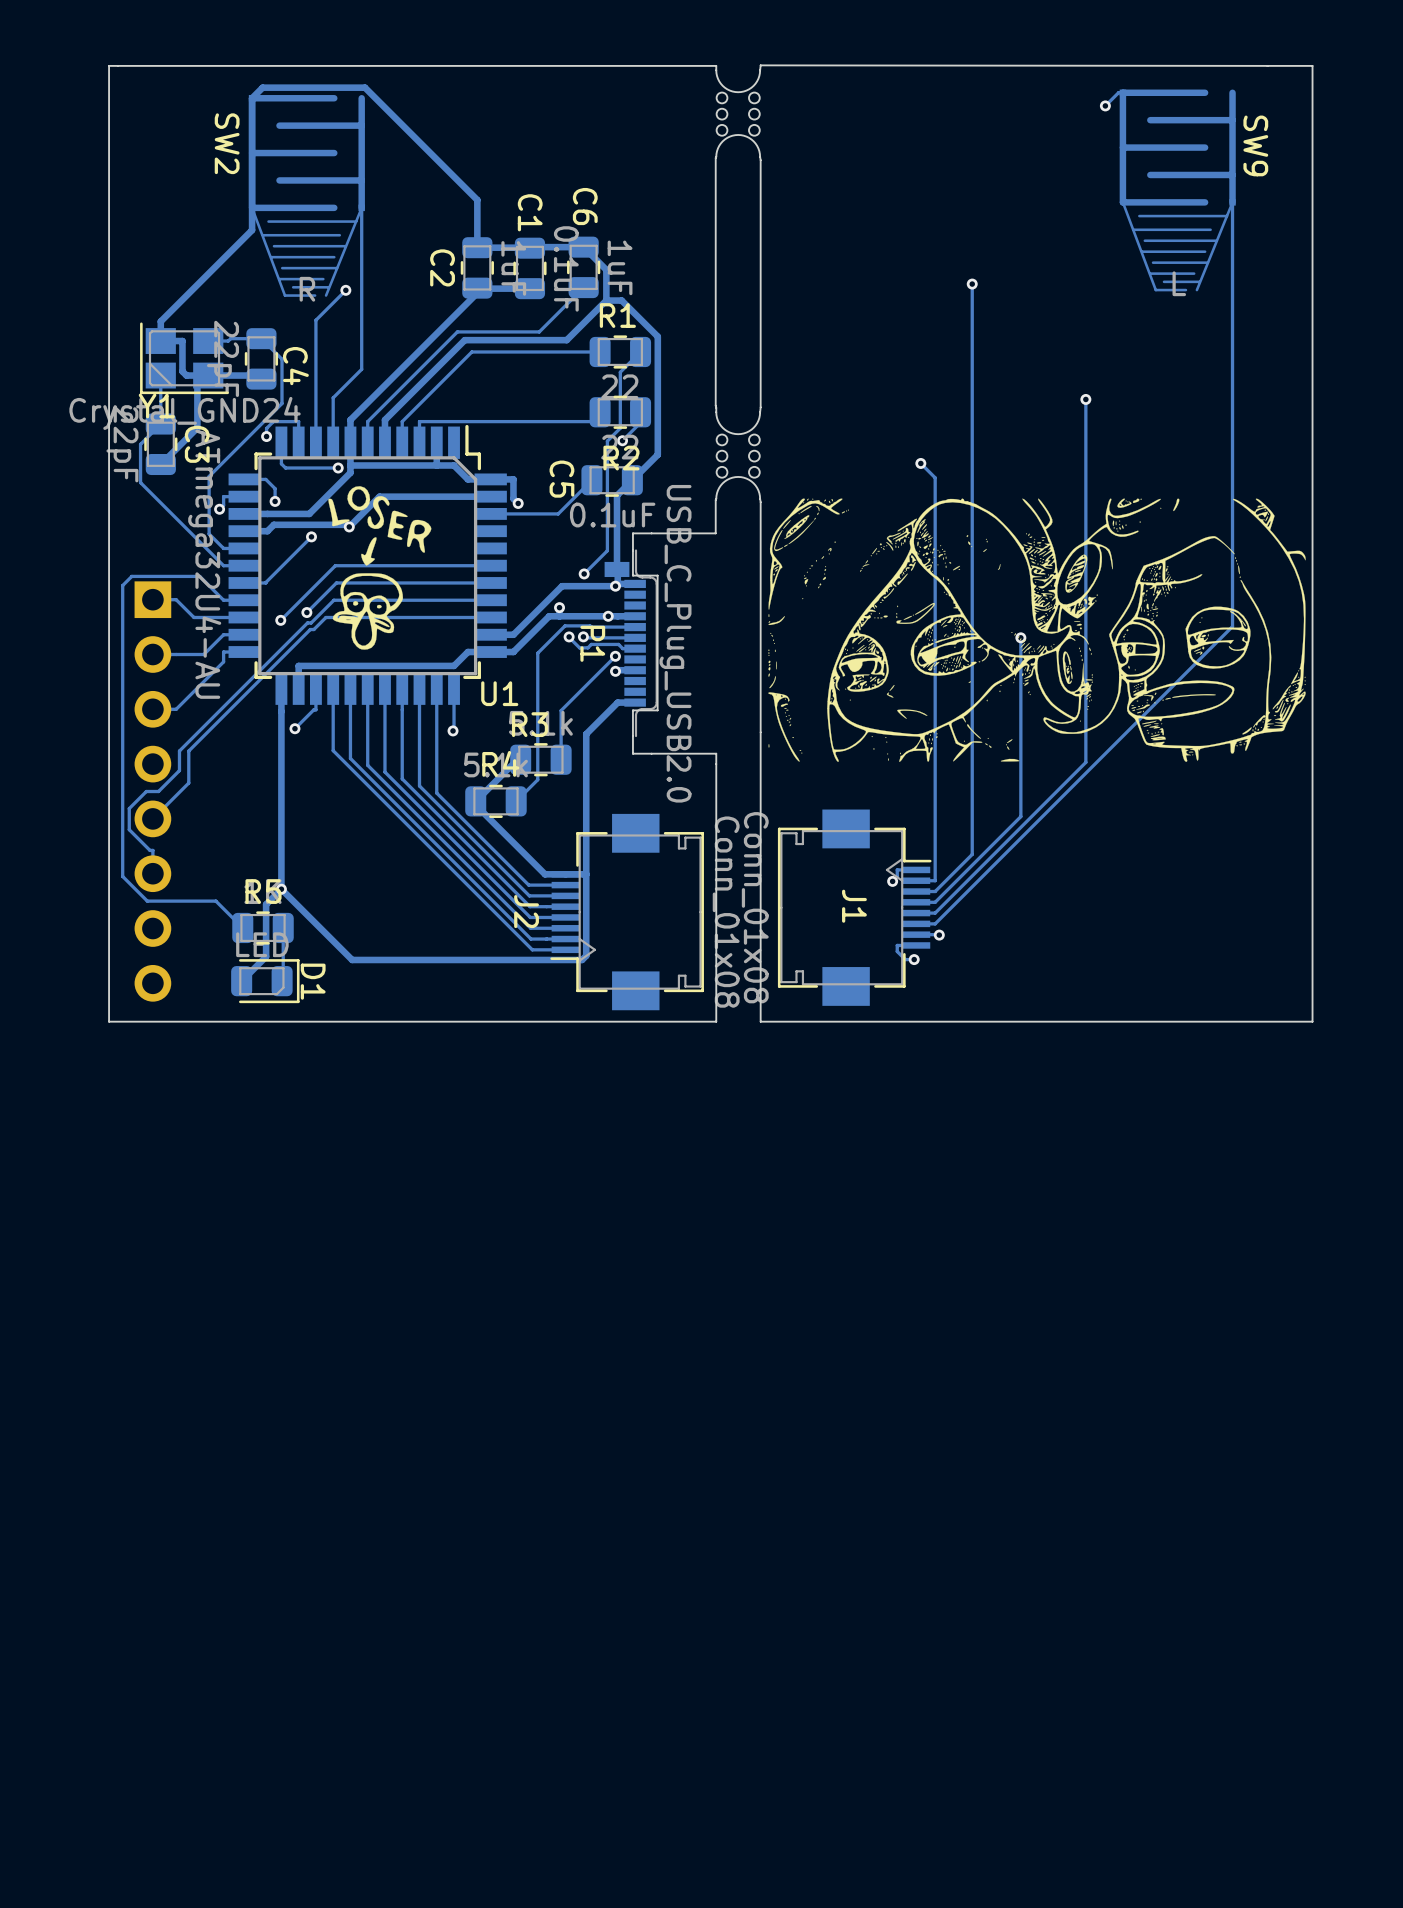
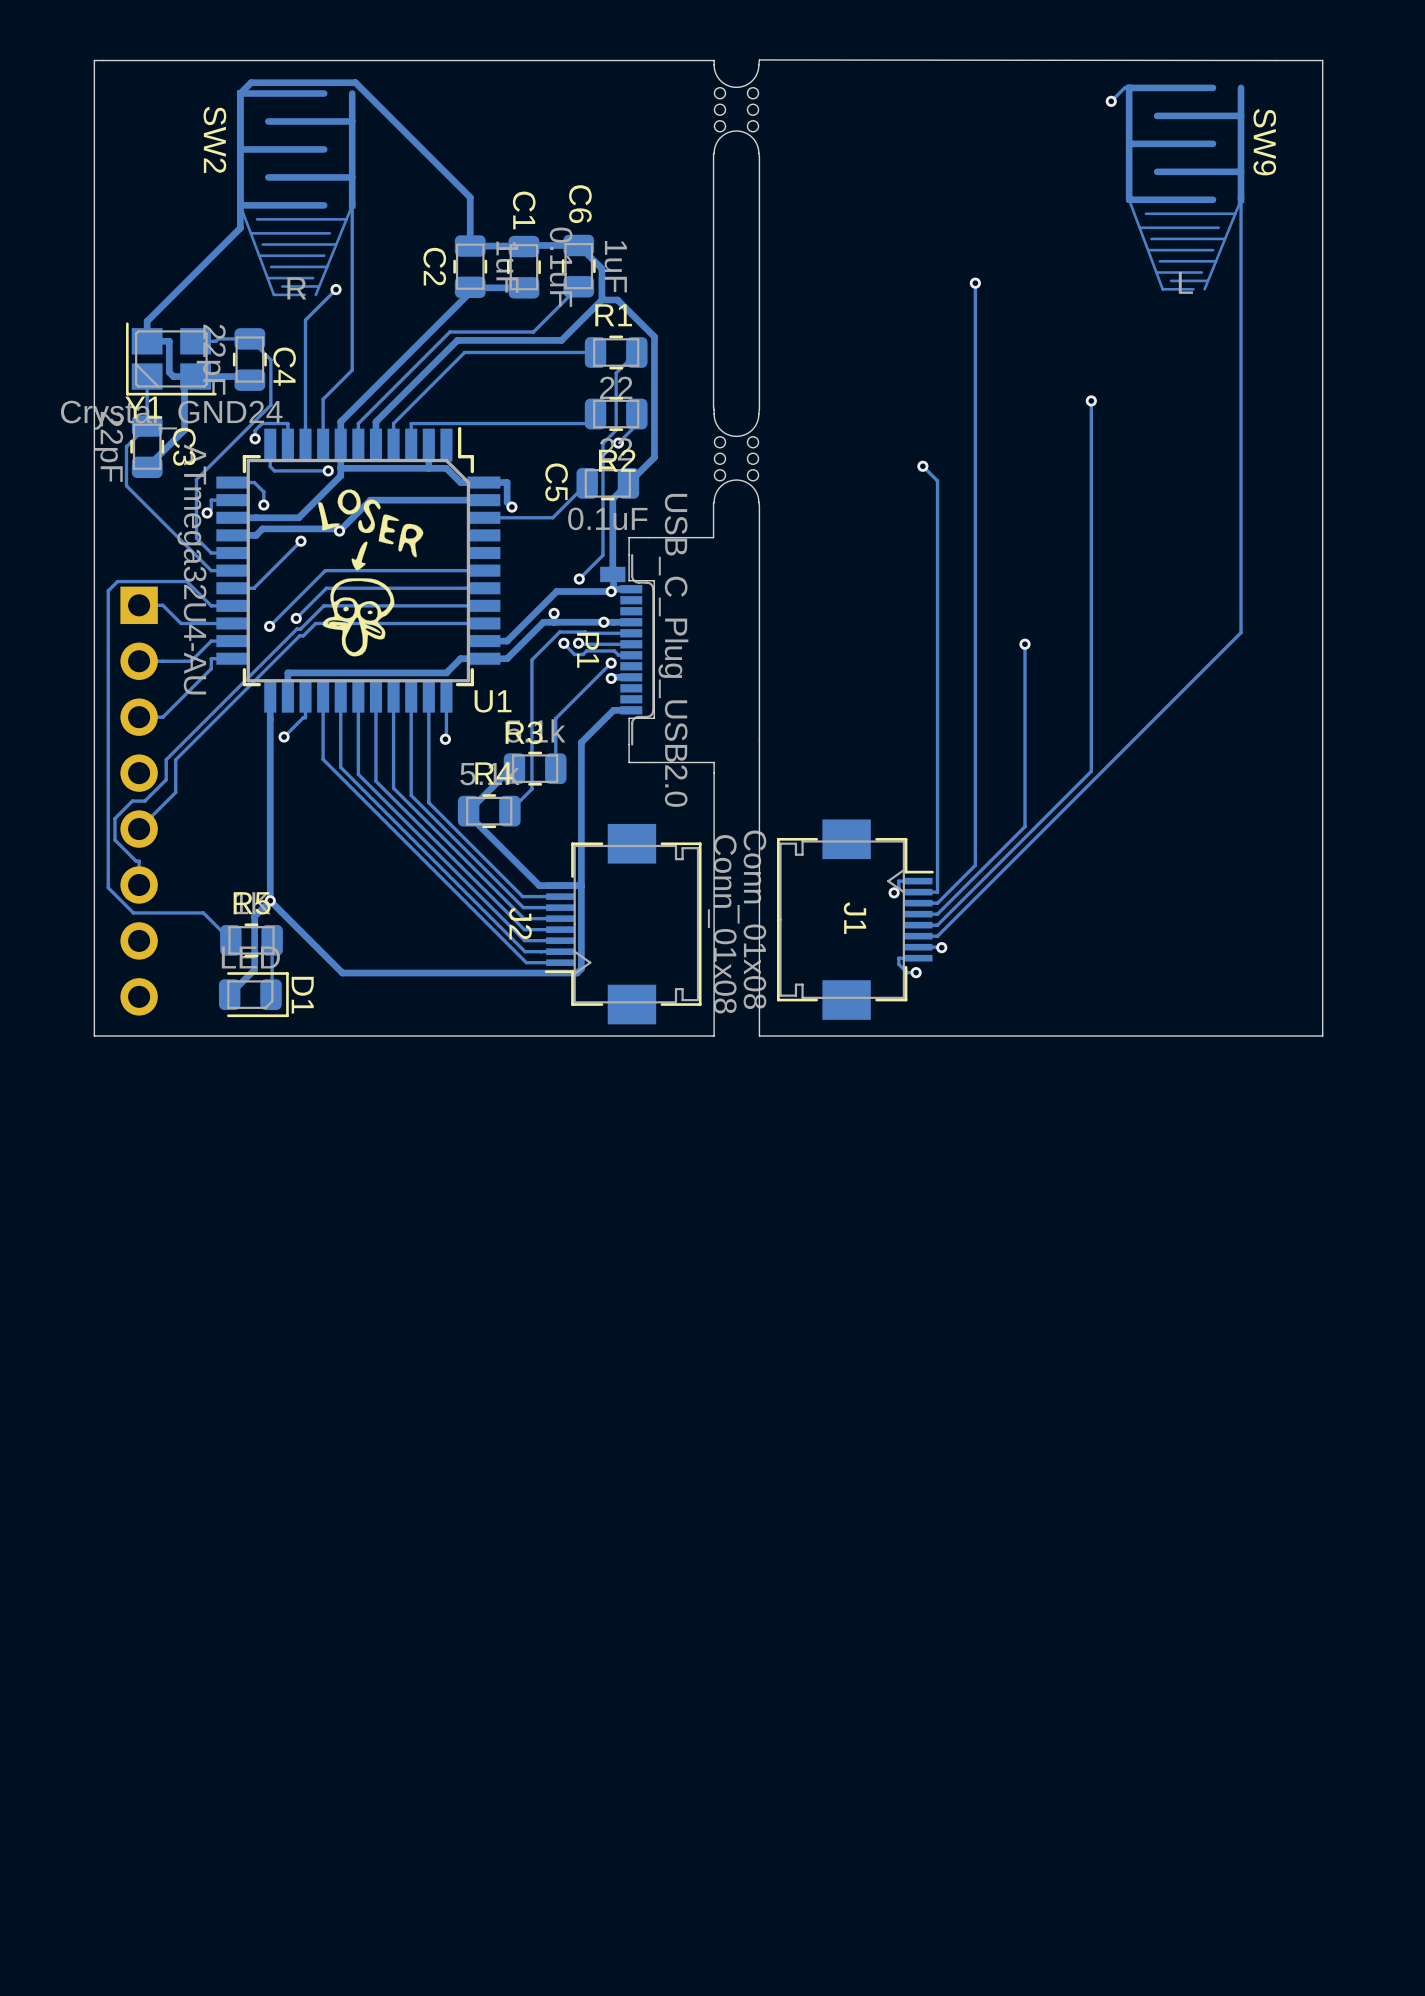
drawing: [768, 498, 1306, 762] -> none

